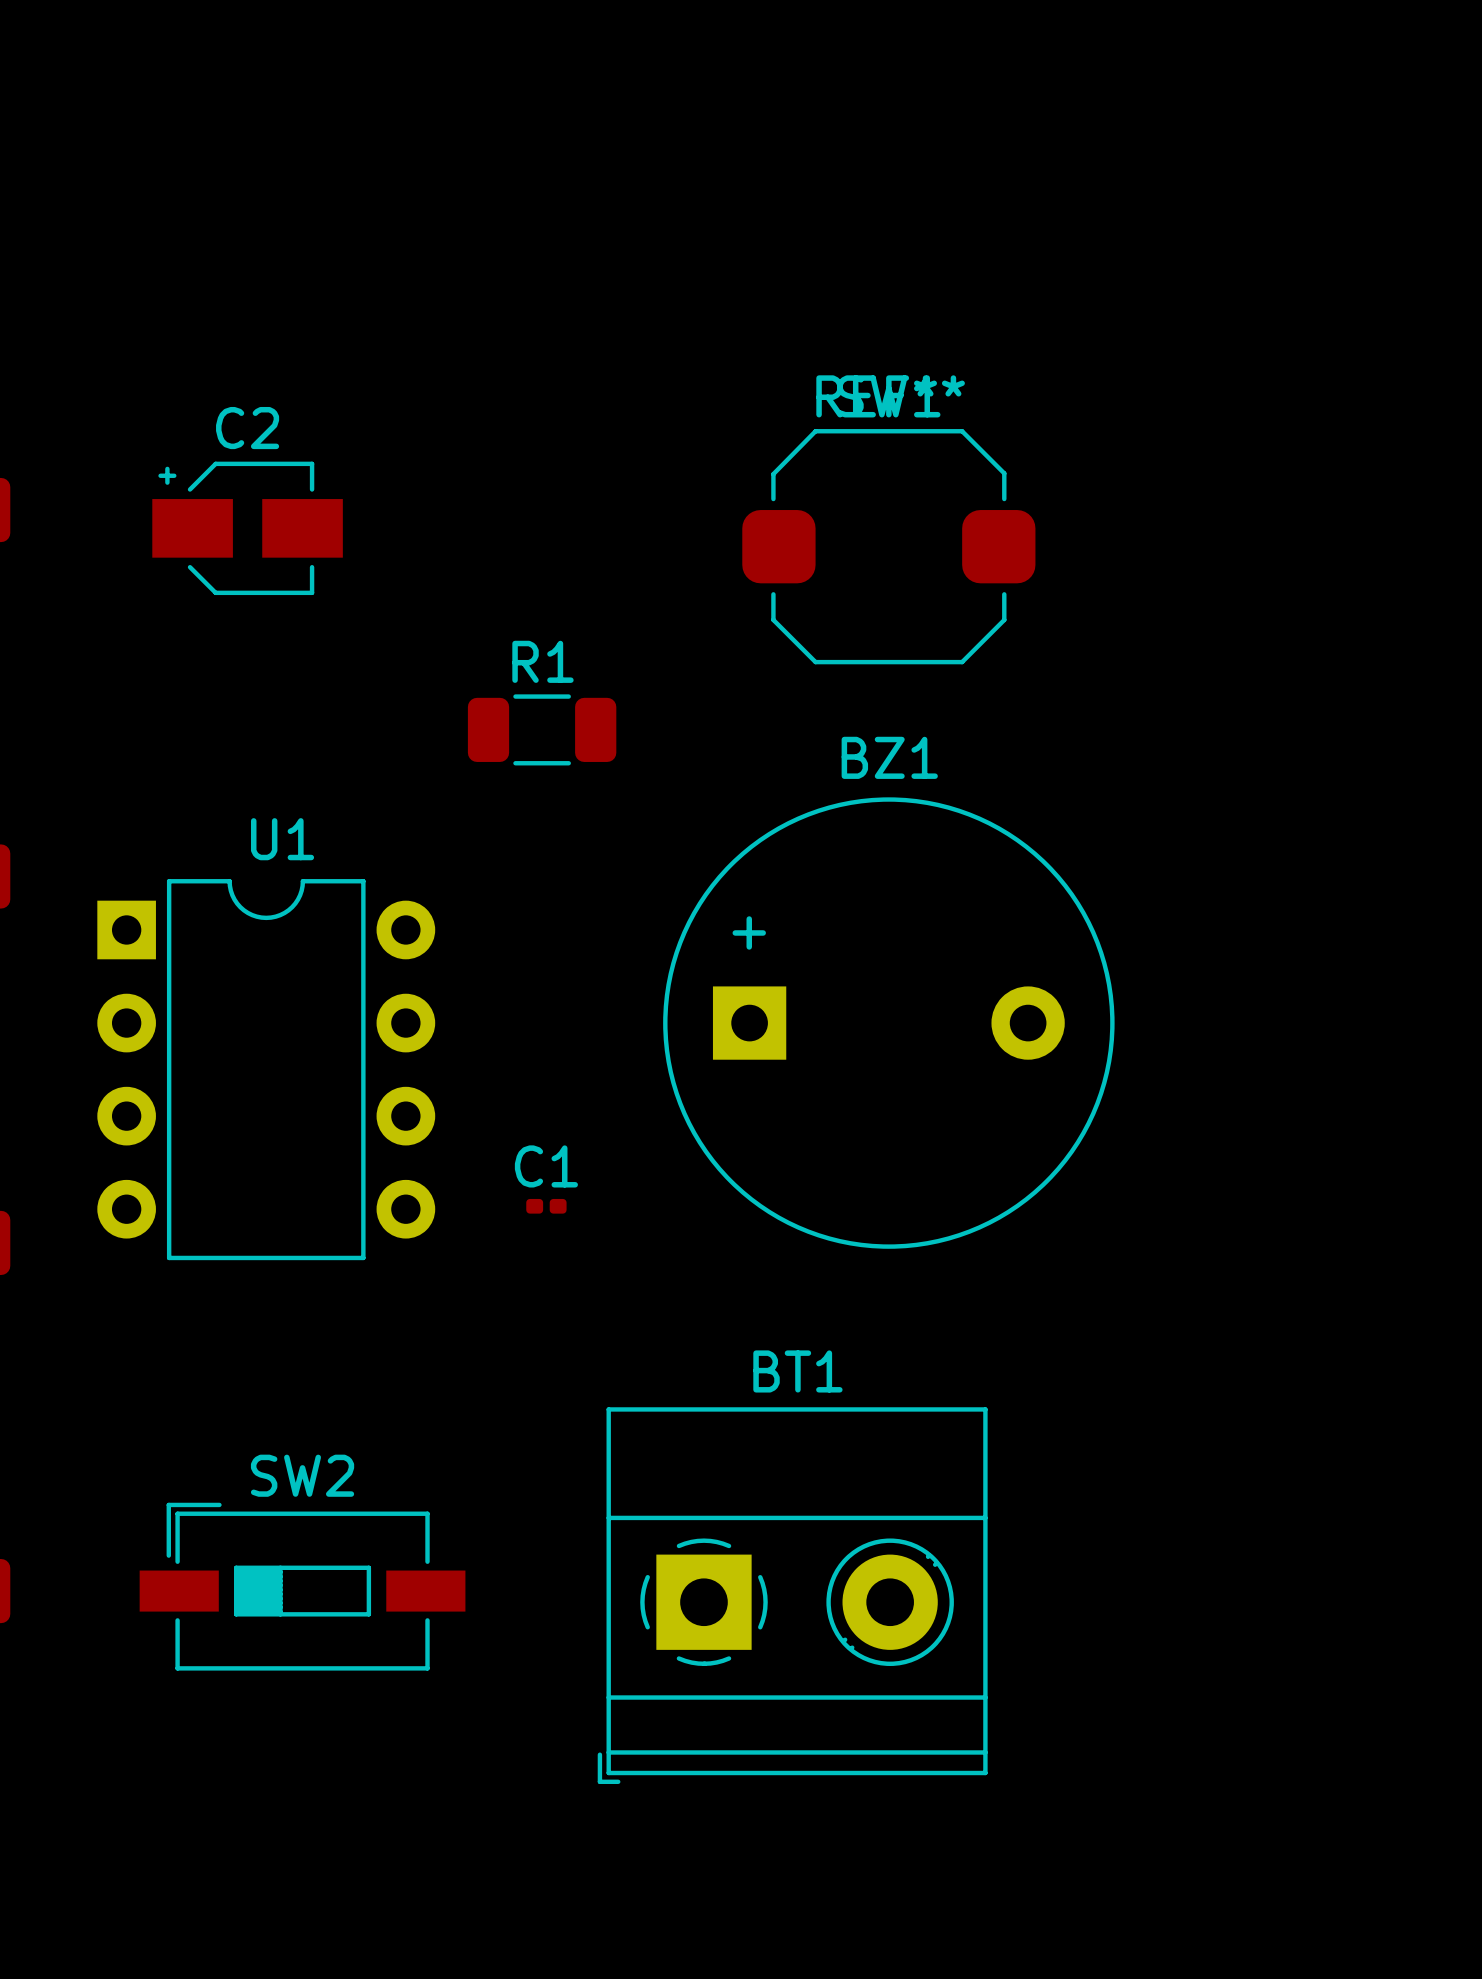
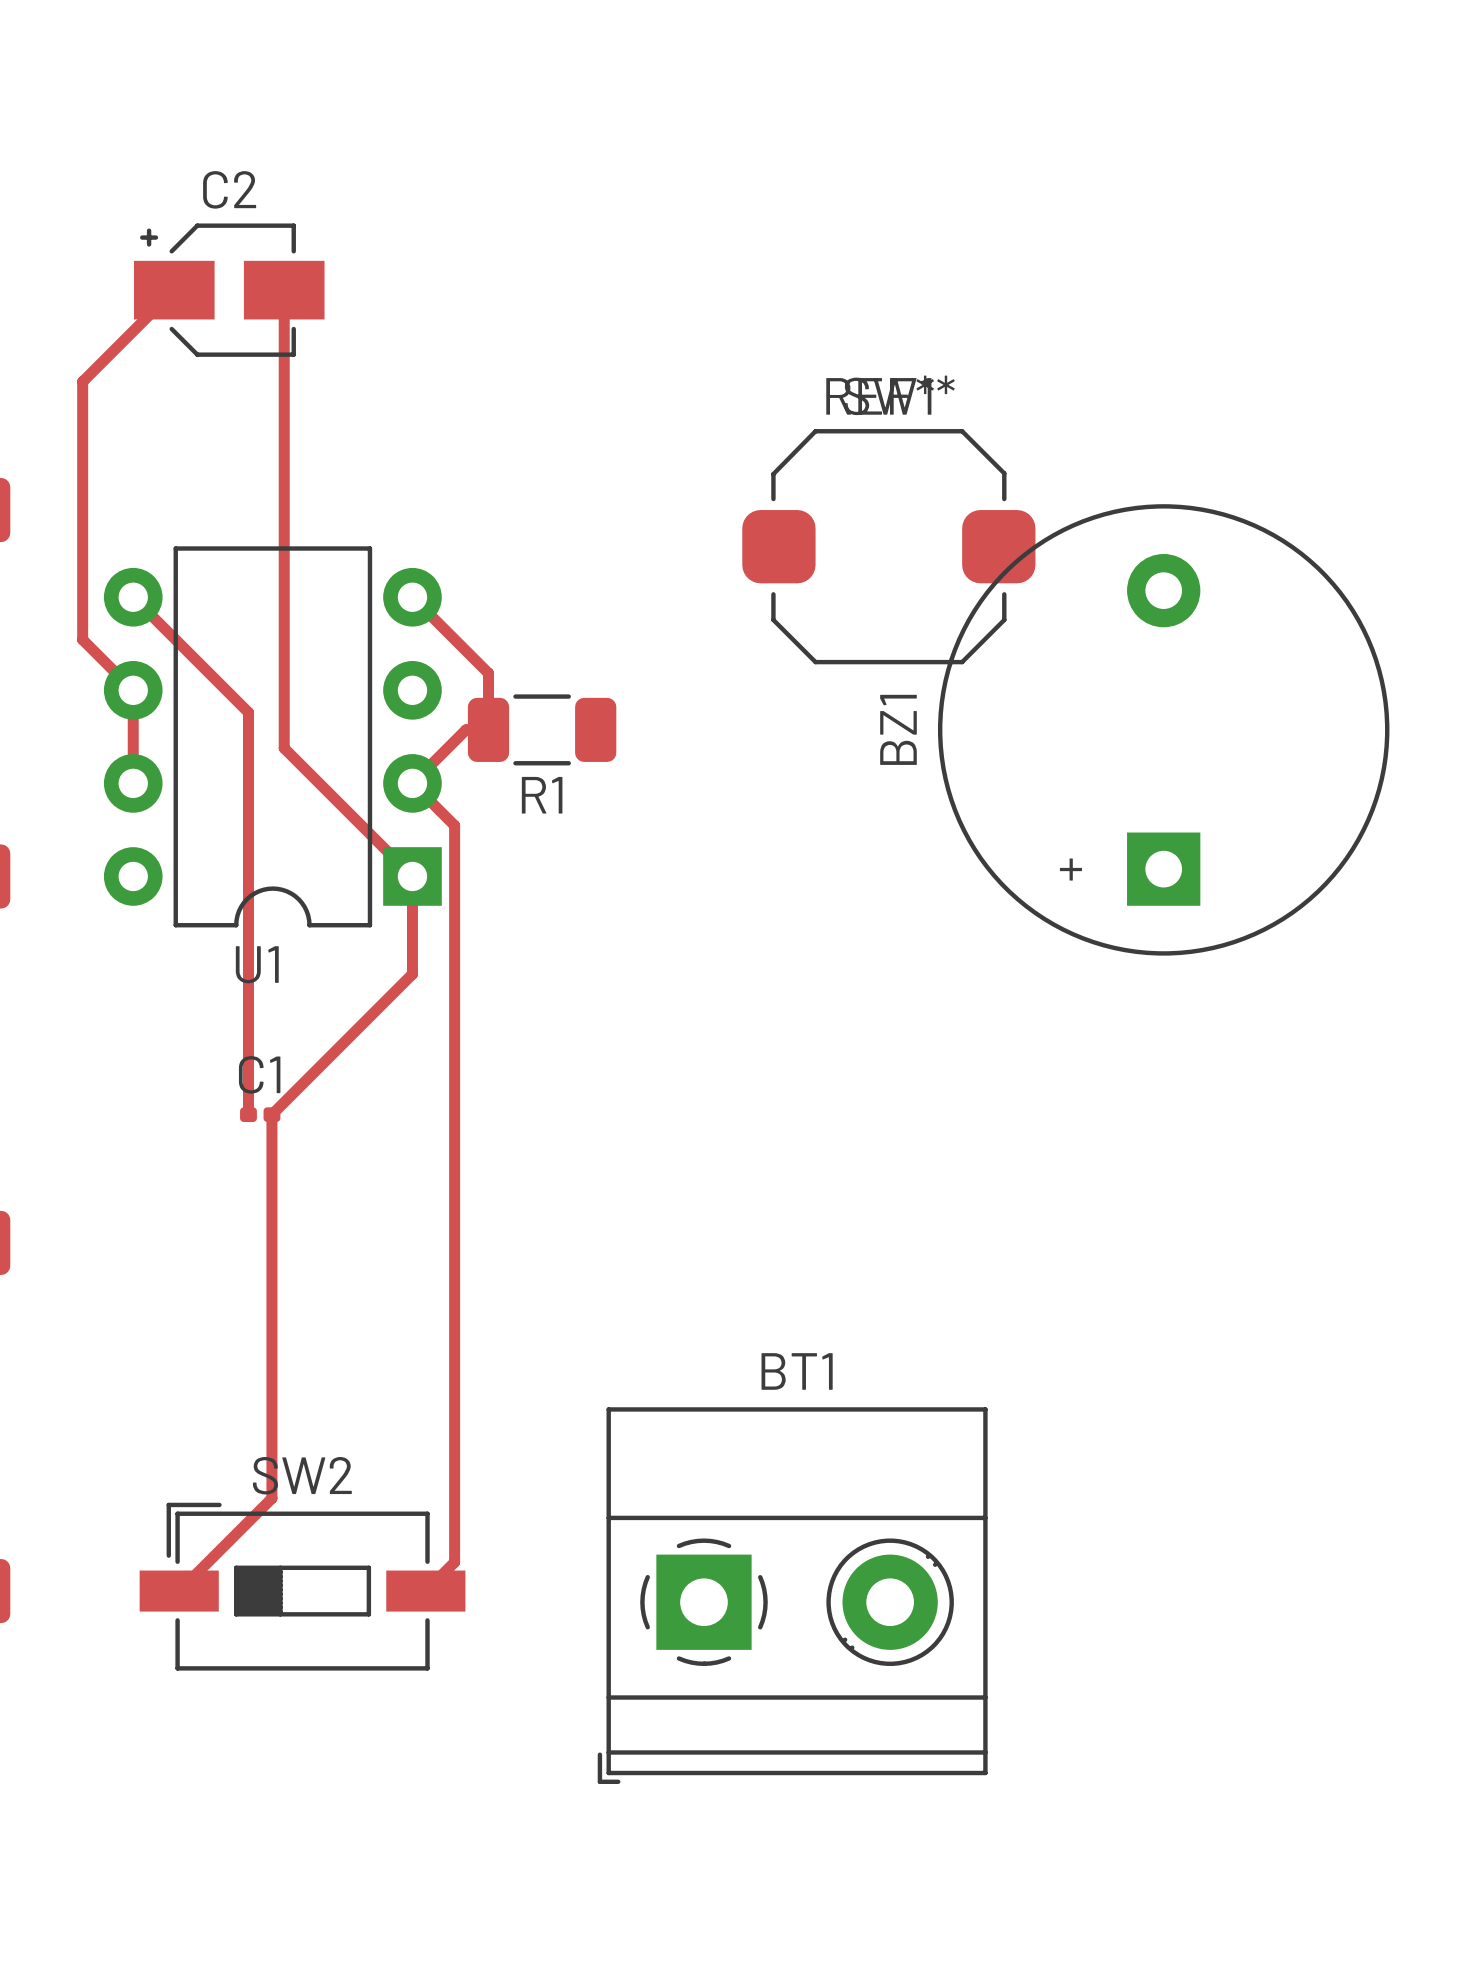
track: none -> (284, 290) (284, 748) (412, 876) (412, 974) (271, 1114) (271, 1498) (179, 1591)
track: none -> (175, 291) (174, 290) (82, 381) (82, 639) (133, 690) (133, 783)
C2 position: (247, 528) -> (229, 290)
track: none -> (133, 597) (248, 712) (248, 1114)
track: none -> (412, 597) (488, 673) (488, 729) (465, 729) (412, 783) (454, 825) (454, 1562) (425, 1591)
R1 name position: R1 (542, 661) -> R1 (542, 795)
BZ1 rotation: 0° (888, 1023) -> 90° counterclockwise (1163, 729)
BZ1 position: (888, 1023) -> (1163, 729)
U1 rotation: 0° (266, 1069) -> 180° (272, 736)
U1 position: (266, 1069) -> (272, 736)
C1 position: (546, 1206) -> (260, 1114)

